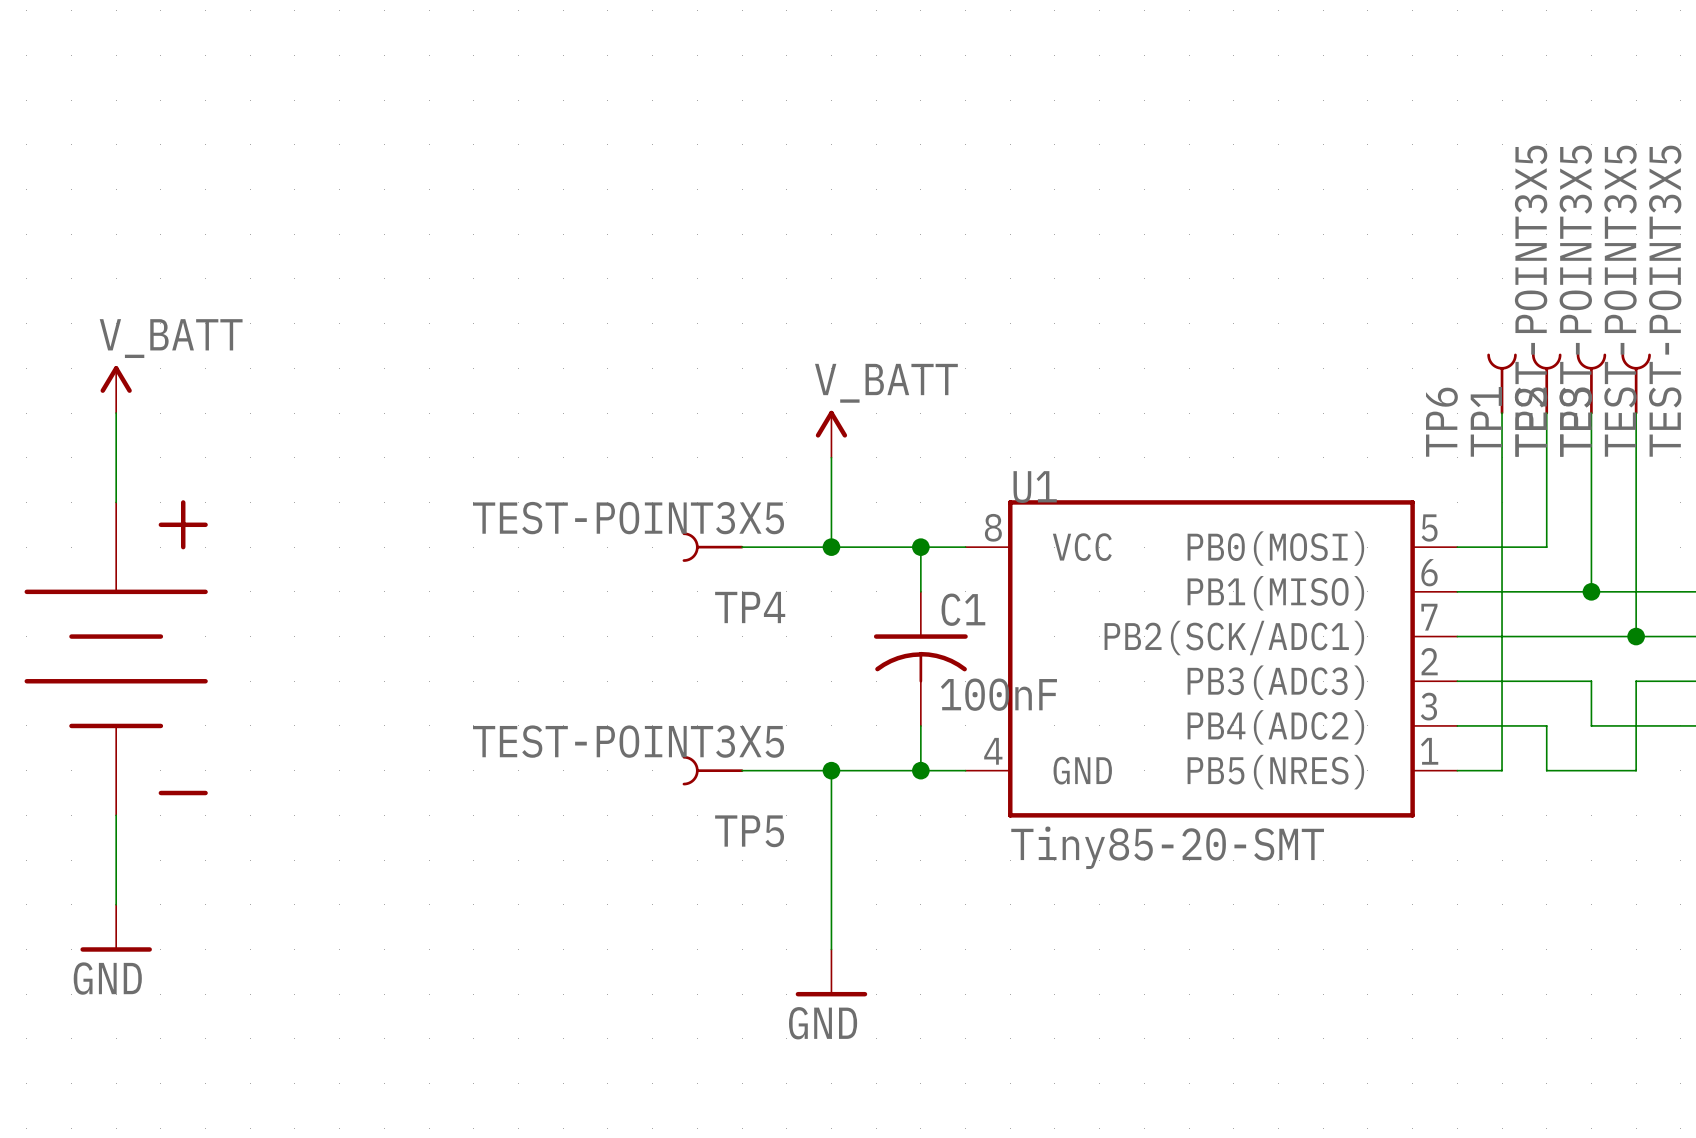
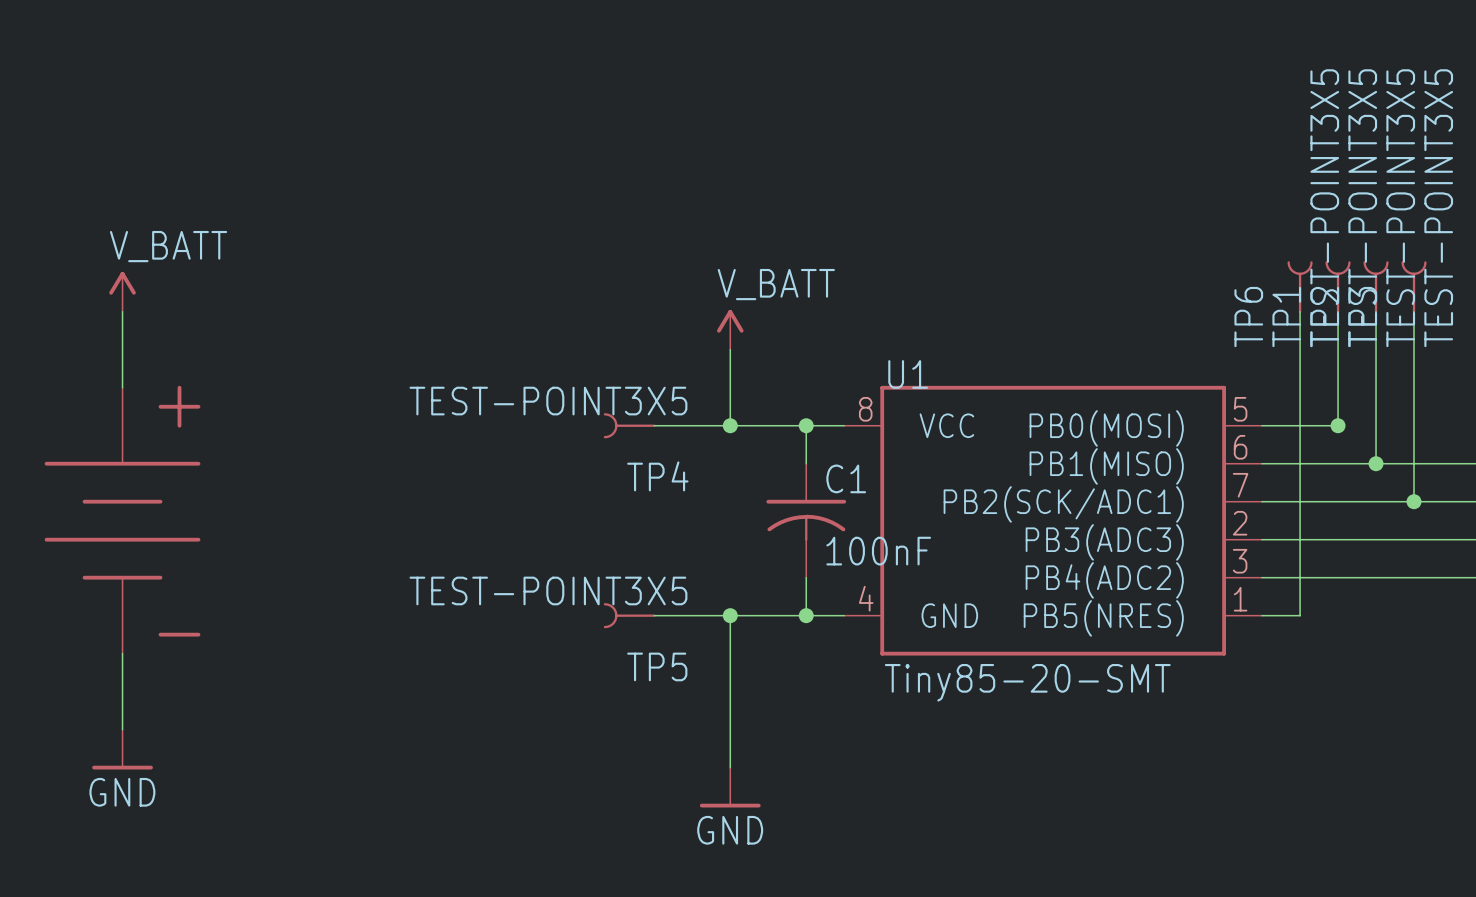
junction: none -> (1338, 425)
wire: (1591, 681) (1591, 725) -> (1338, 577) (1376, 577)
wire: (1636, 681) (1636, 770) (1546, 770) (1546, 725) -> (1414, 539) (1376, 539)

